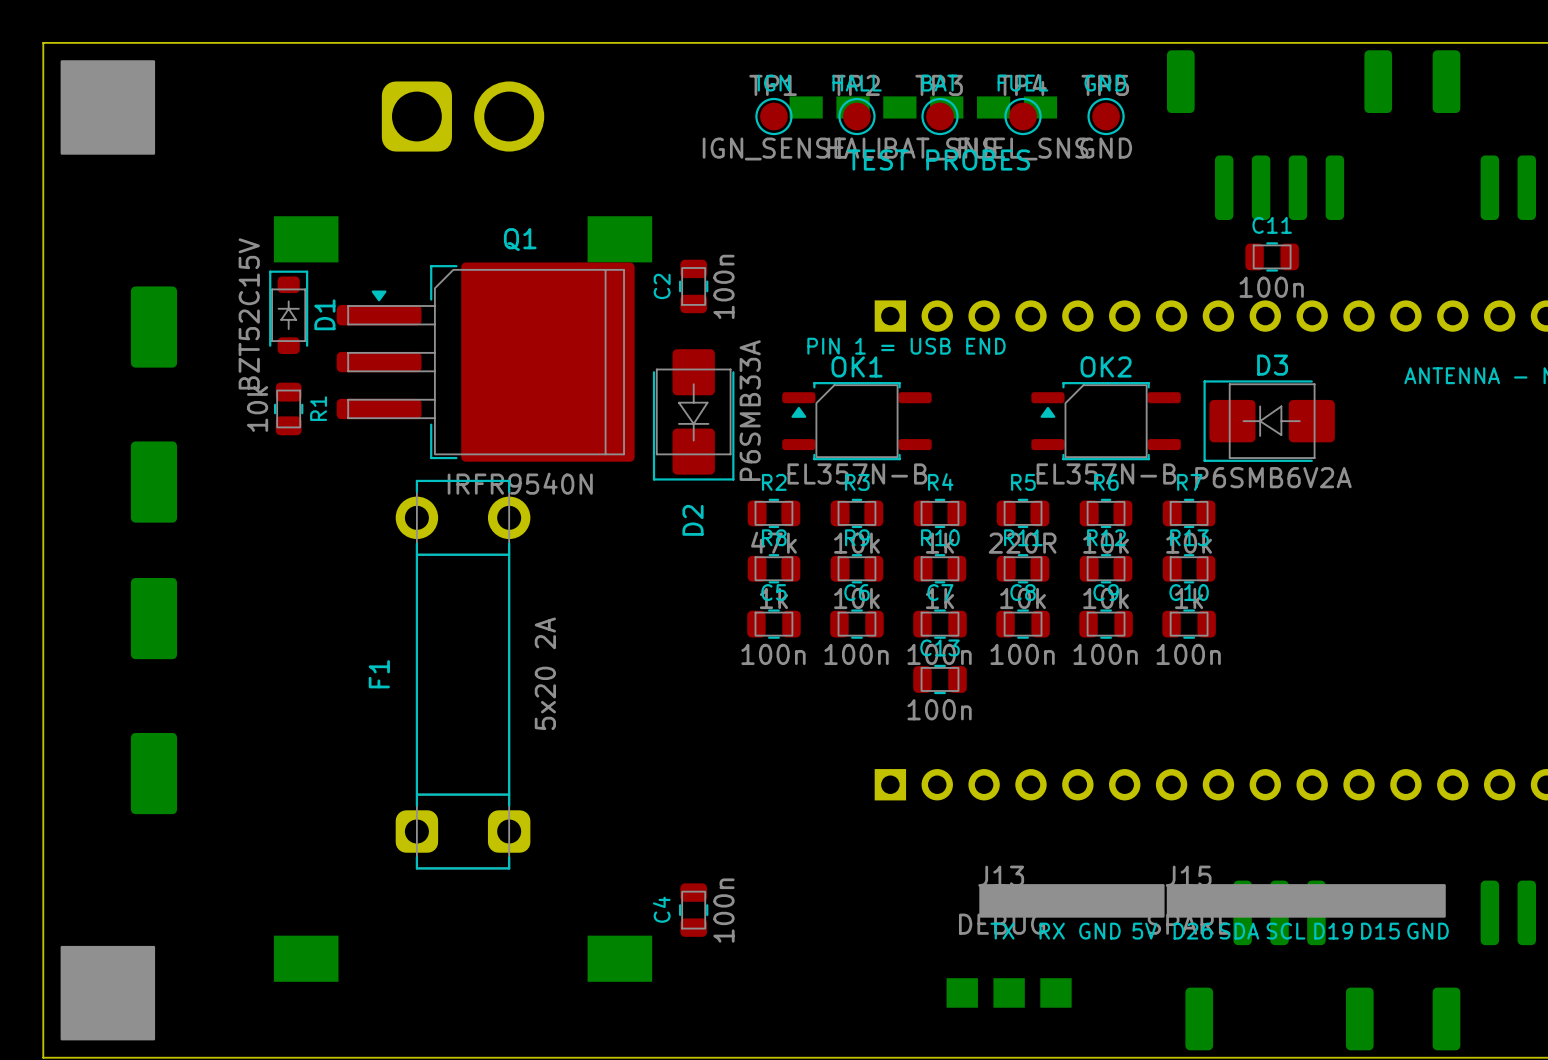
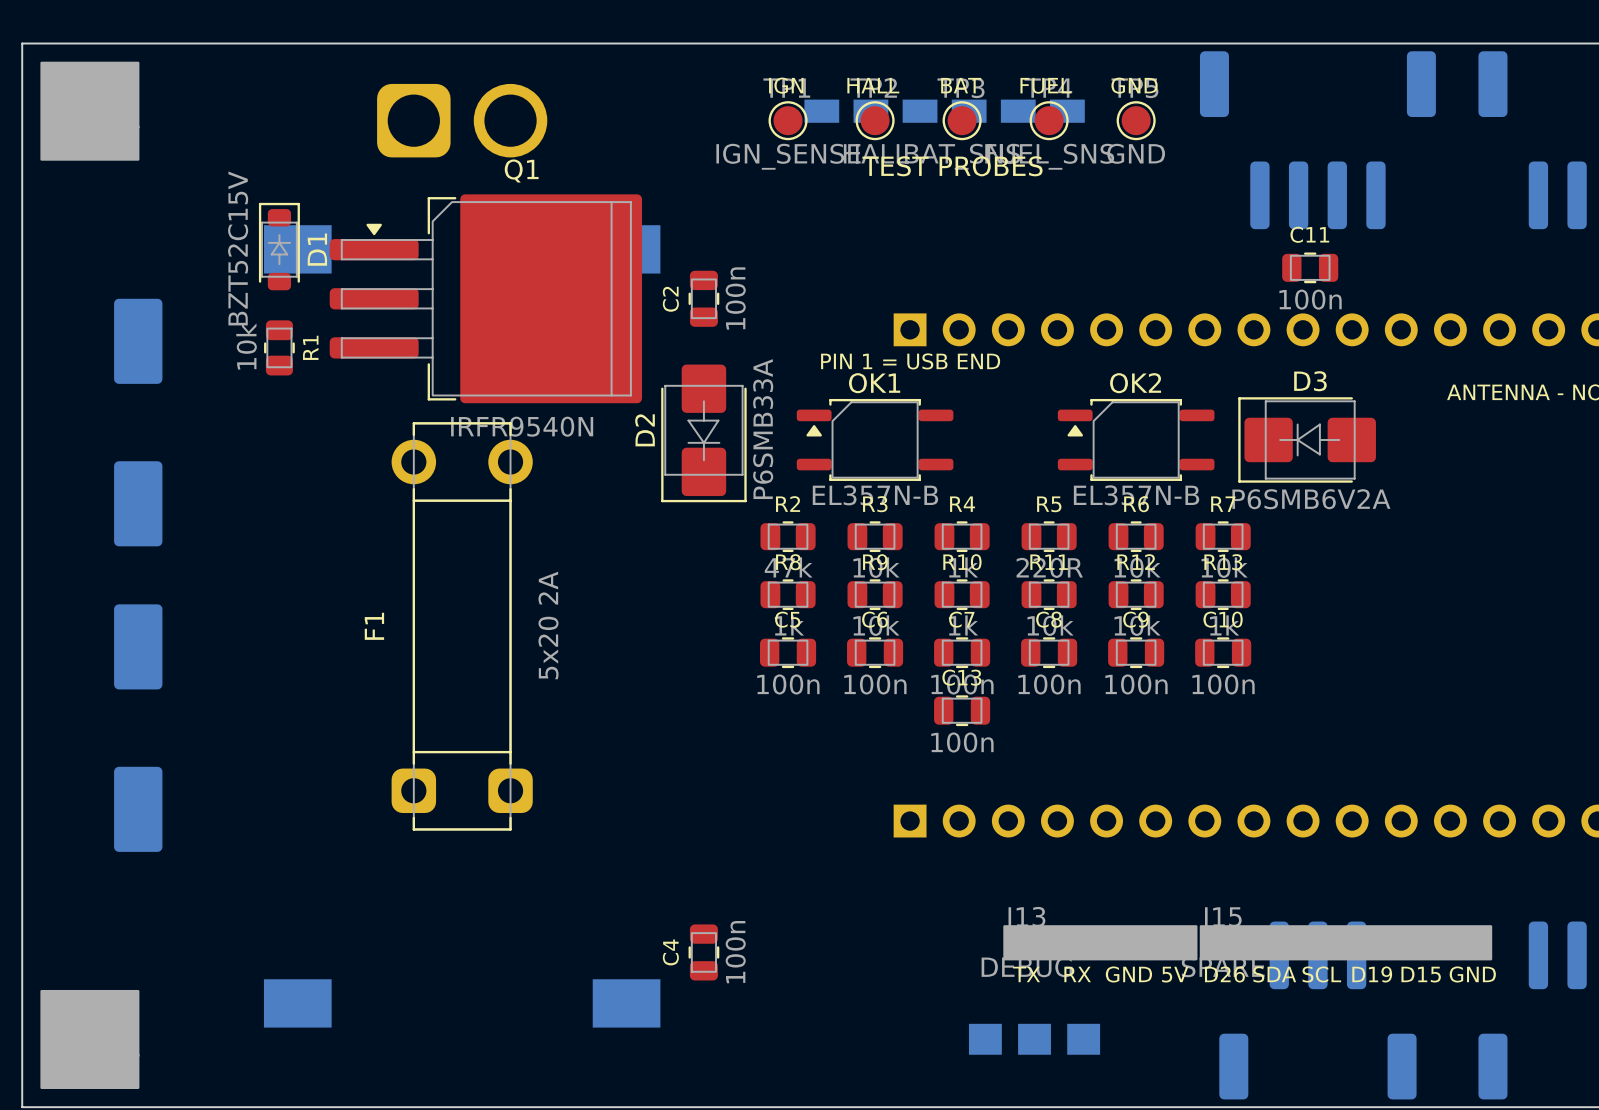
D1 position: (288, 312) -> (279, 246)
Q1 position: (485, 362) -> (485, 298)
R1 position: (288, 408) -> (279, 347)
D2 name position: D2 (692, 520) -> D2 (645, 430)
F1 position: (463, 674) -> (462, 626)

